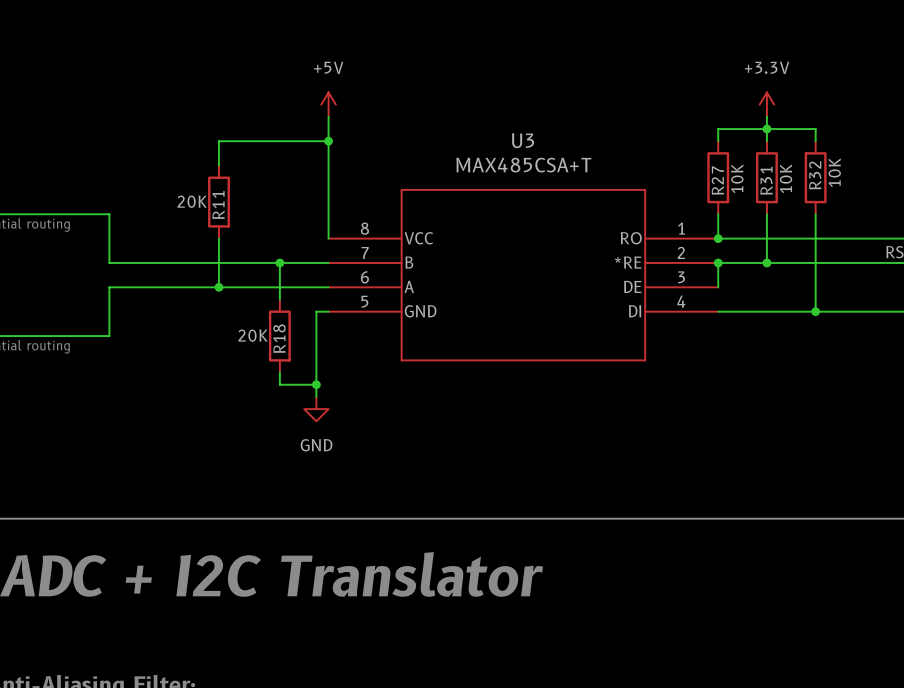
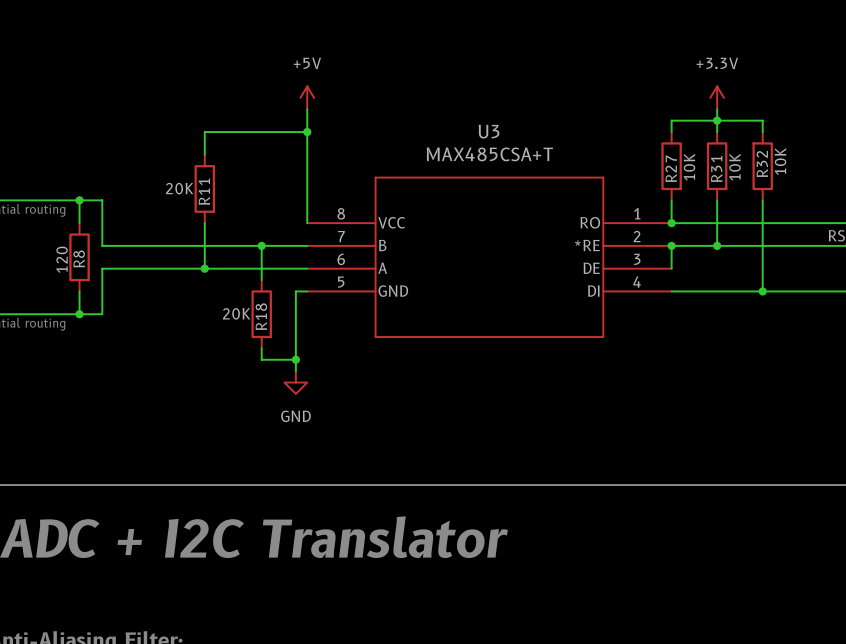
wire: none -> (79, 200) (79, 223)
junction: none -> (79, 200)
R8: none -> 120 (79, 257)
wire: none -> (79, 291) (79, 314)
junction: none -> (79, 314)

